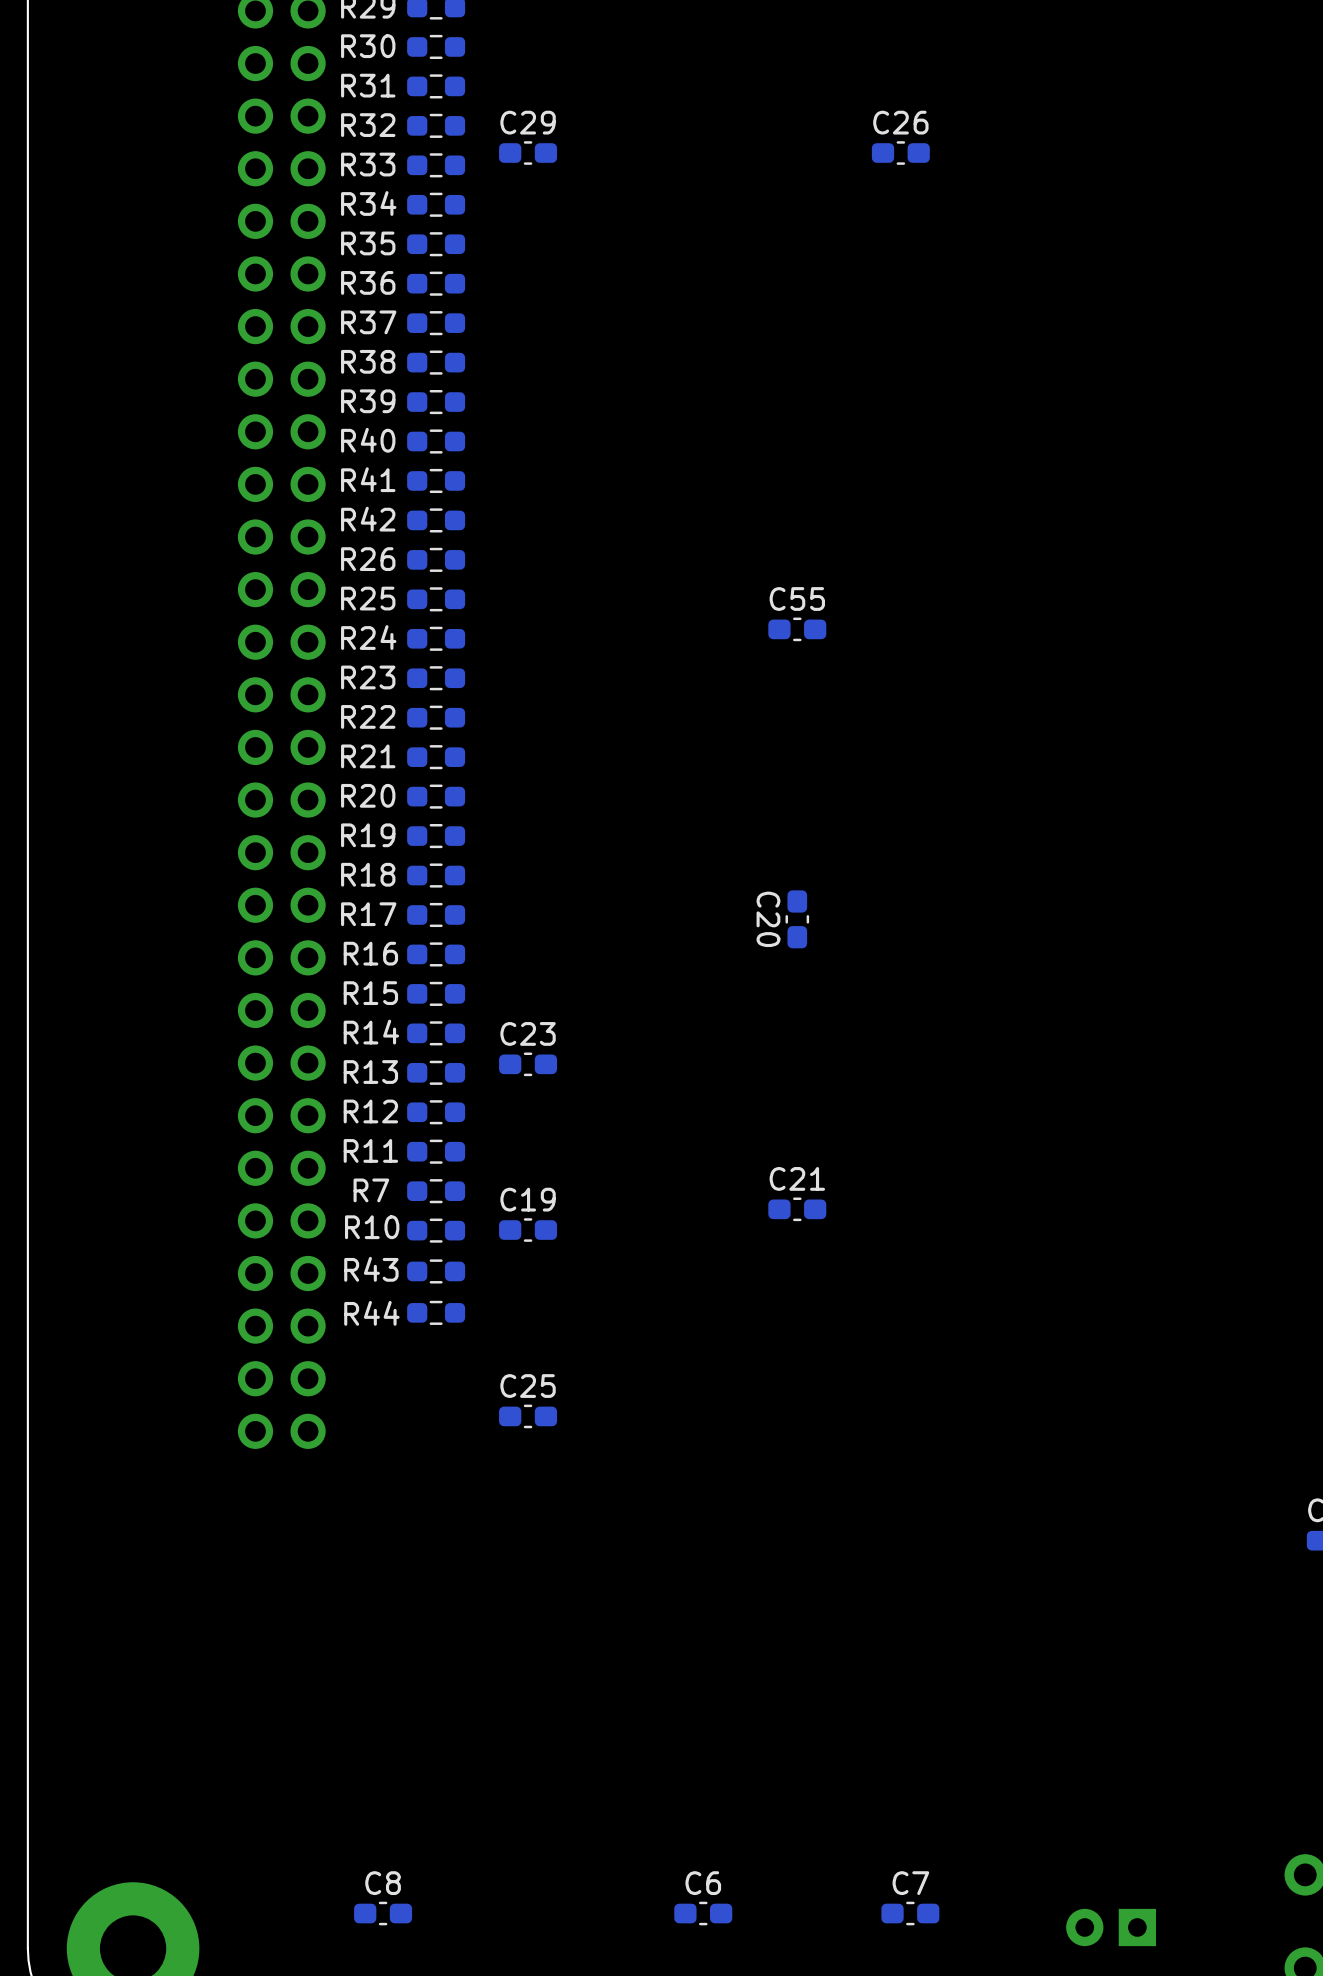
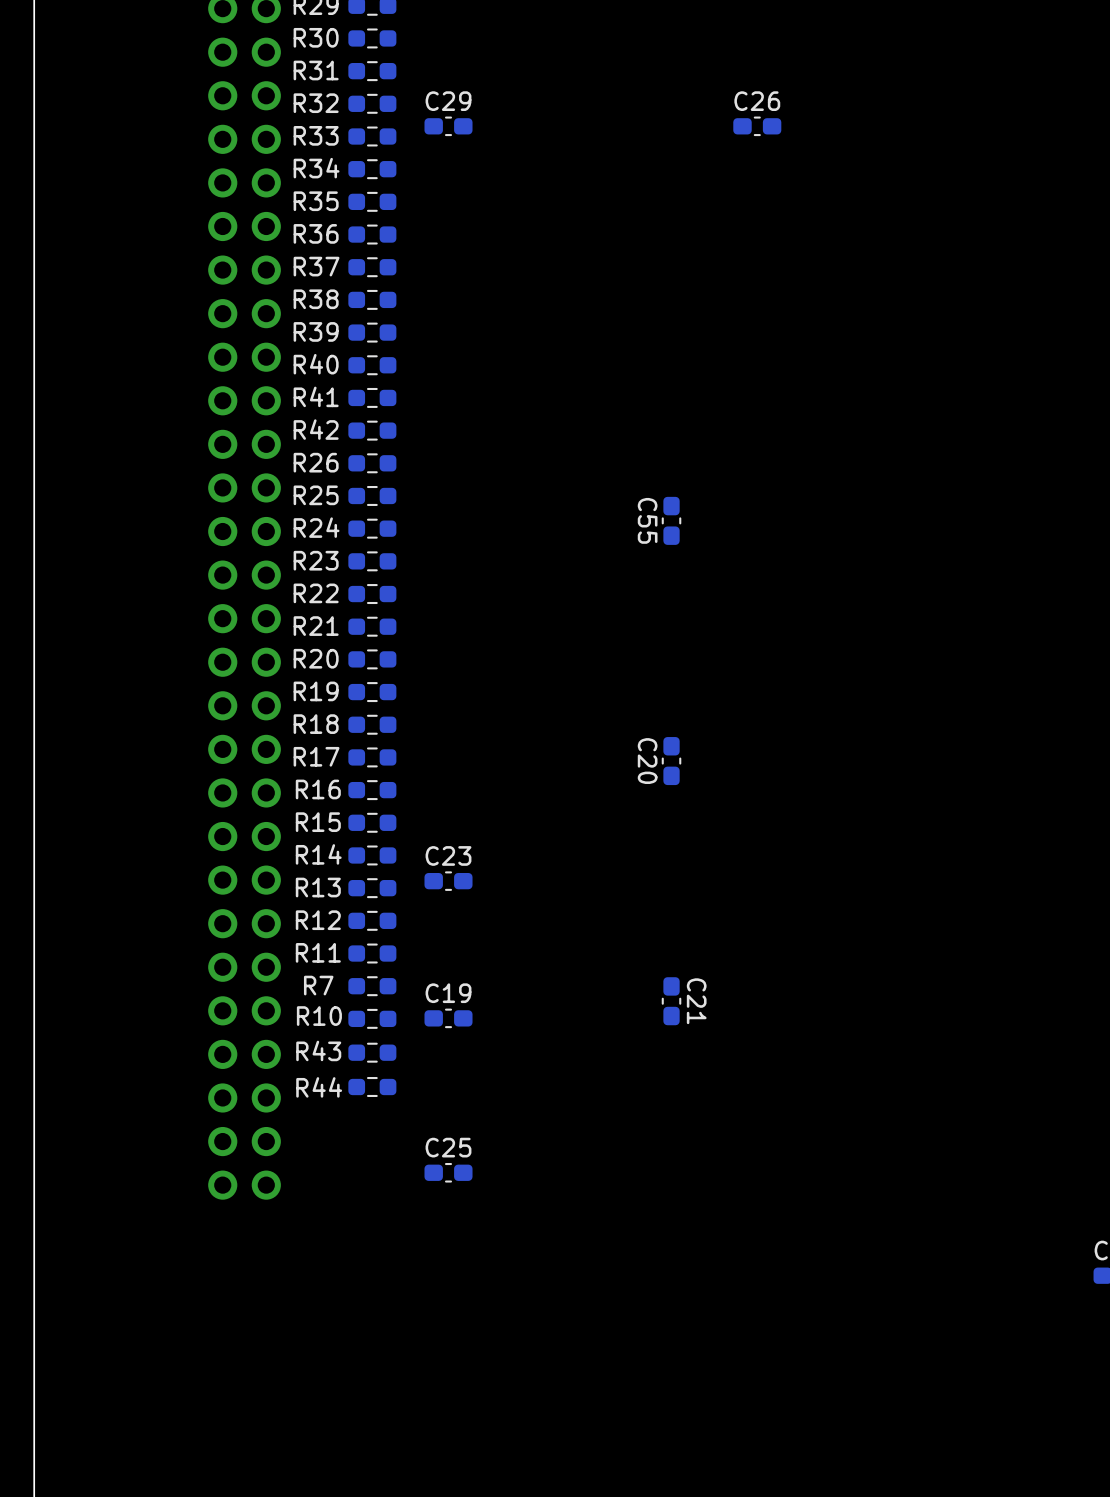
C55 name position: C55 (797, 598) -> C55 (647, 520)
C55 rotation: 0° (797, 629) -> 90° clockwise (671, 520)
C21 rotation: 0° (797, 1209) -> 90° clockwise (671, 1001)

